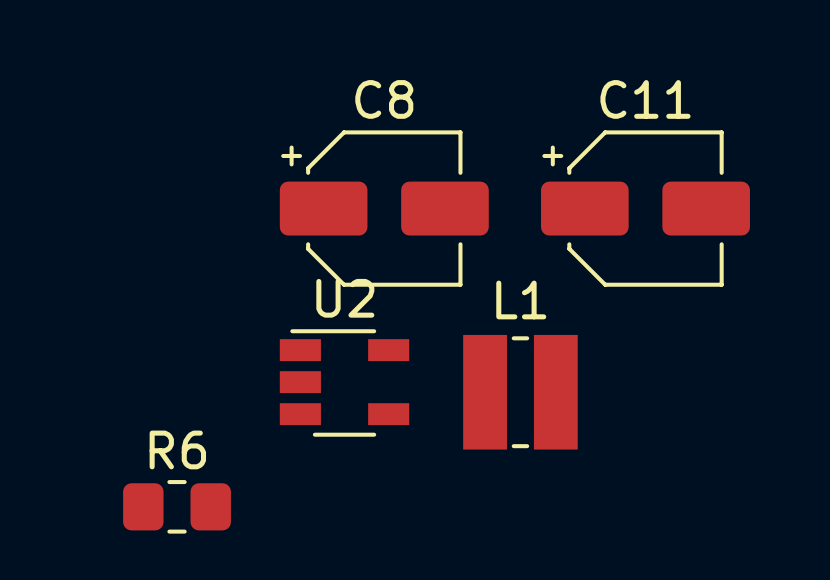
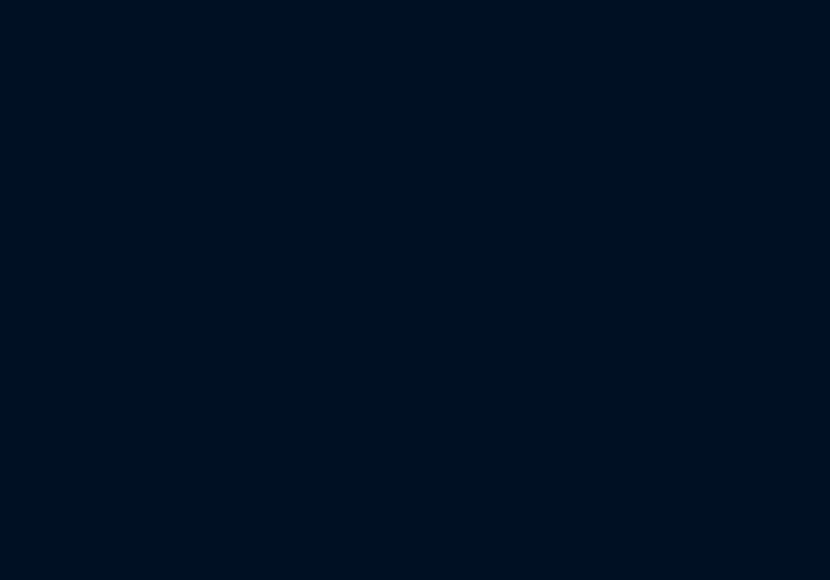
C8: (384, 208) -> none
C11: (645, 208) -> none
U2: (344, 382) -> none
L1: (520, 392) -> none
R6: (177, 506) -> none

